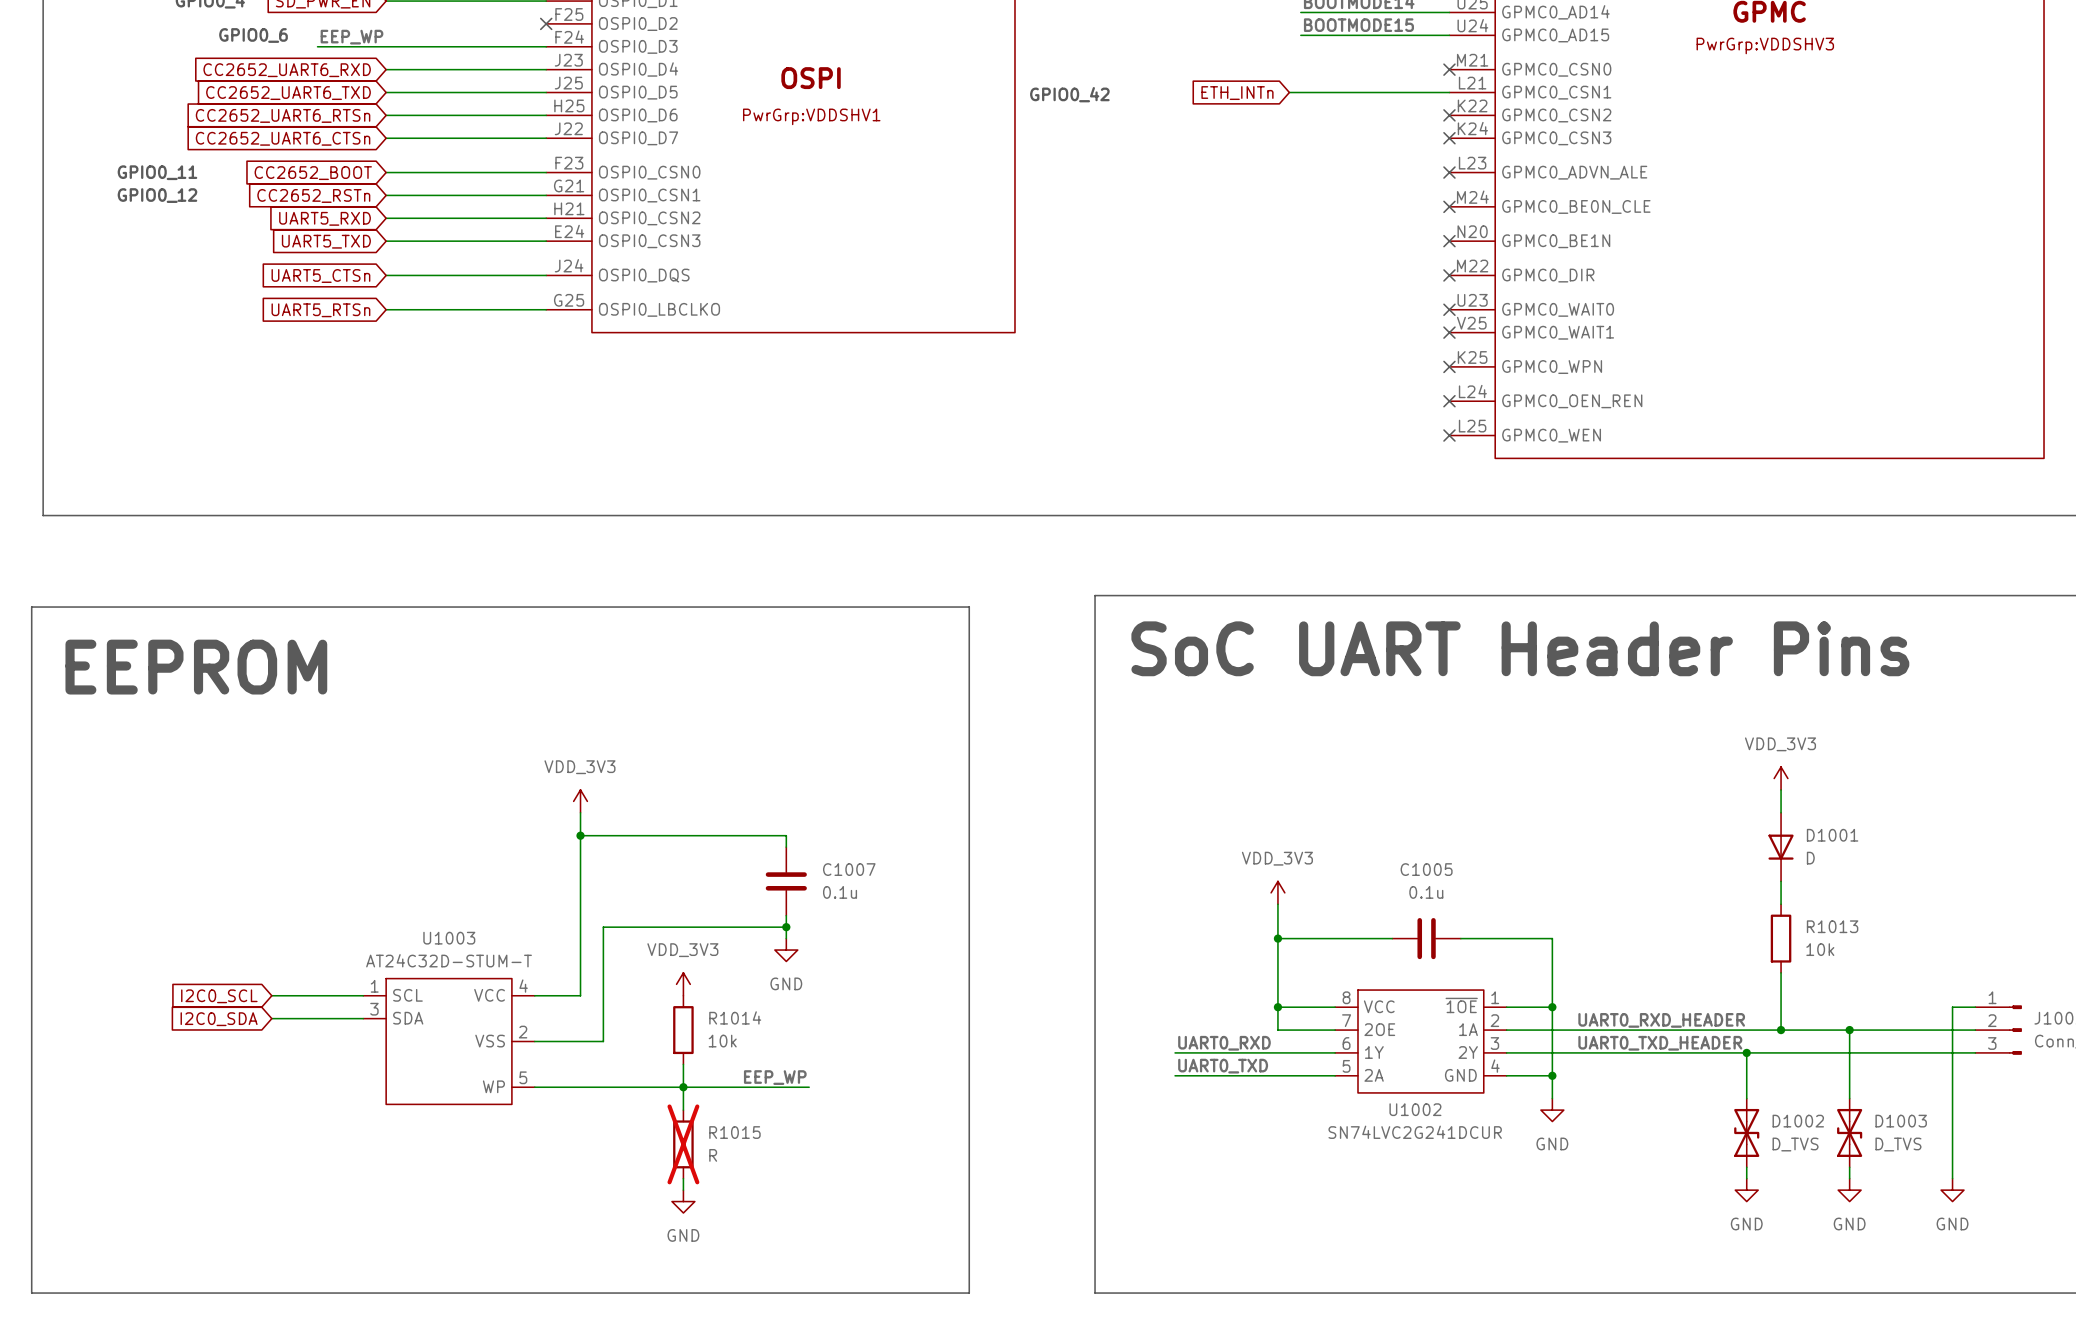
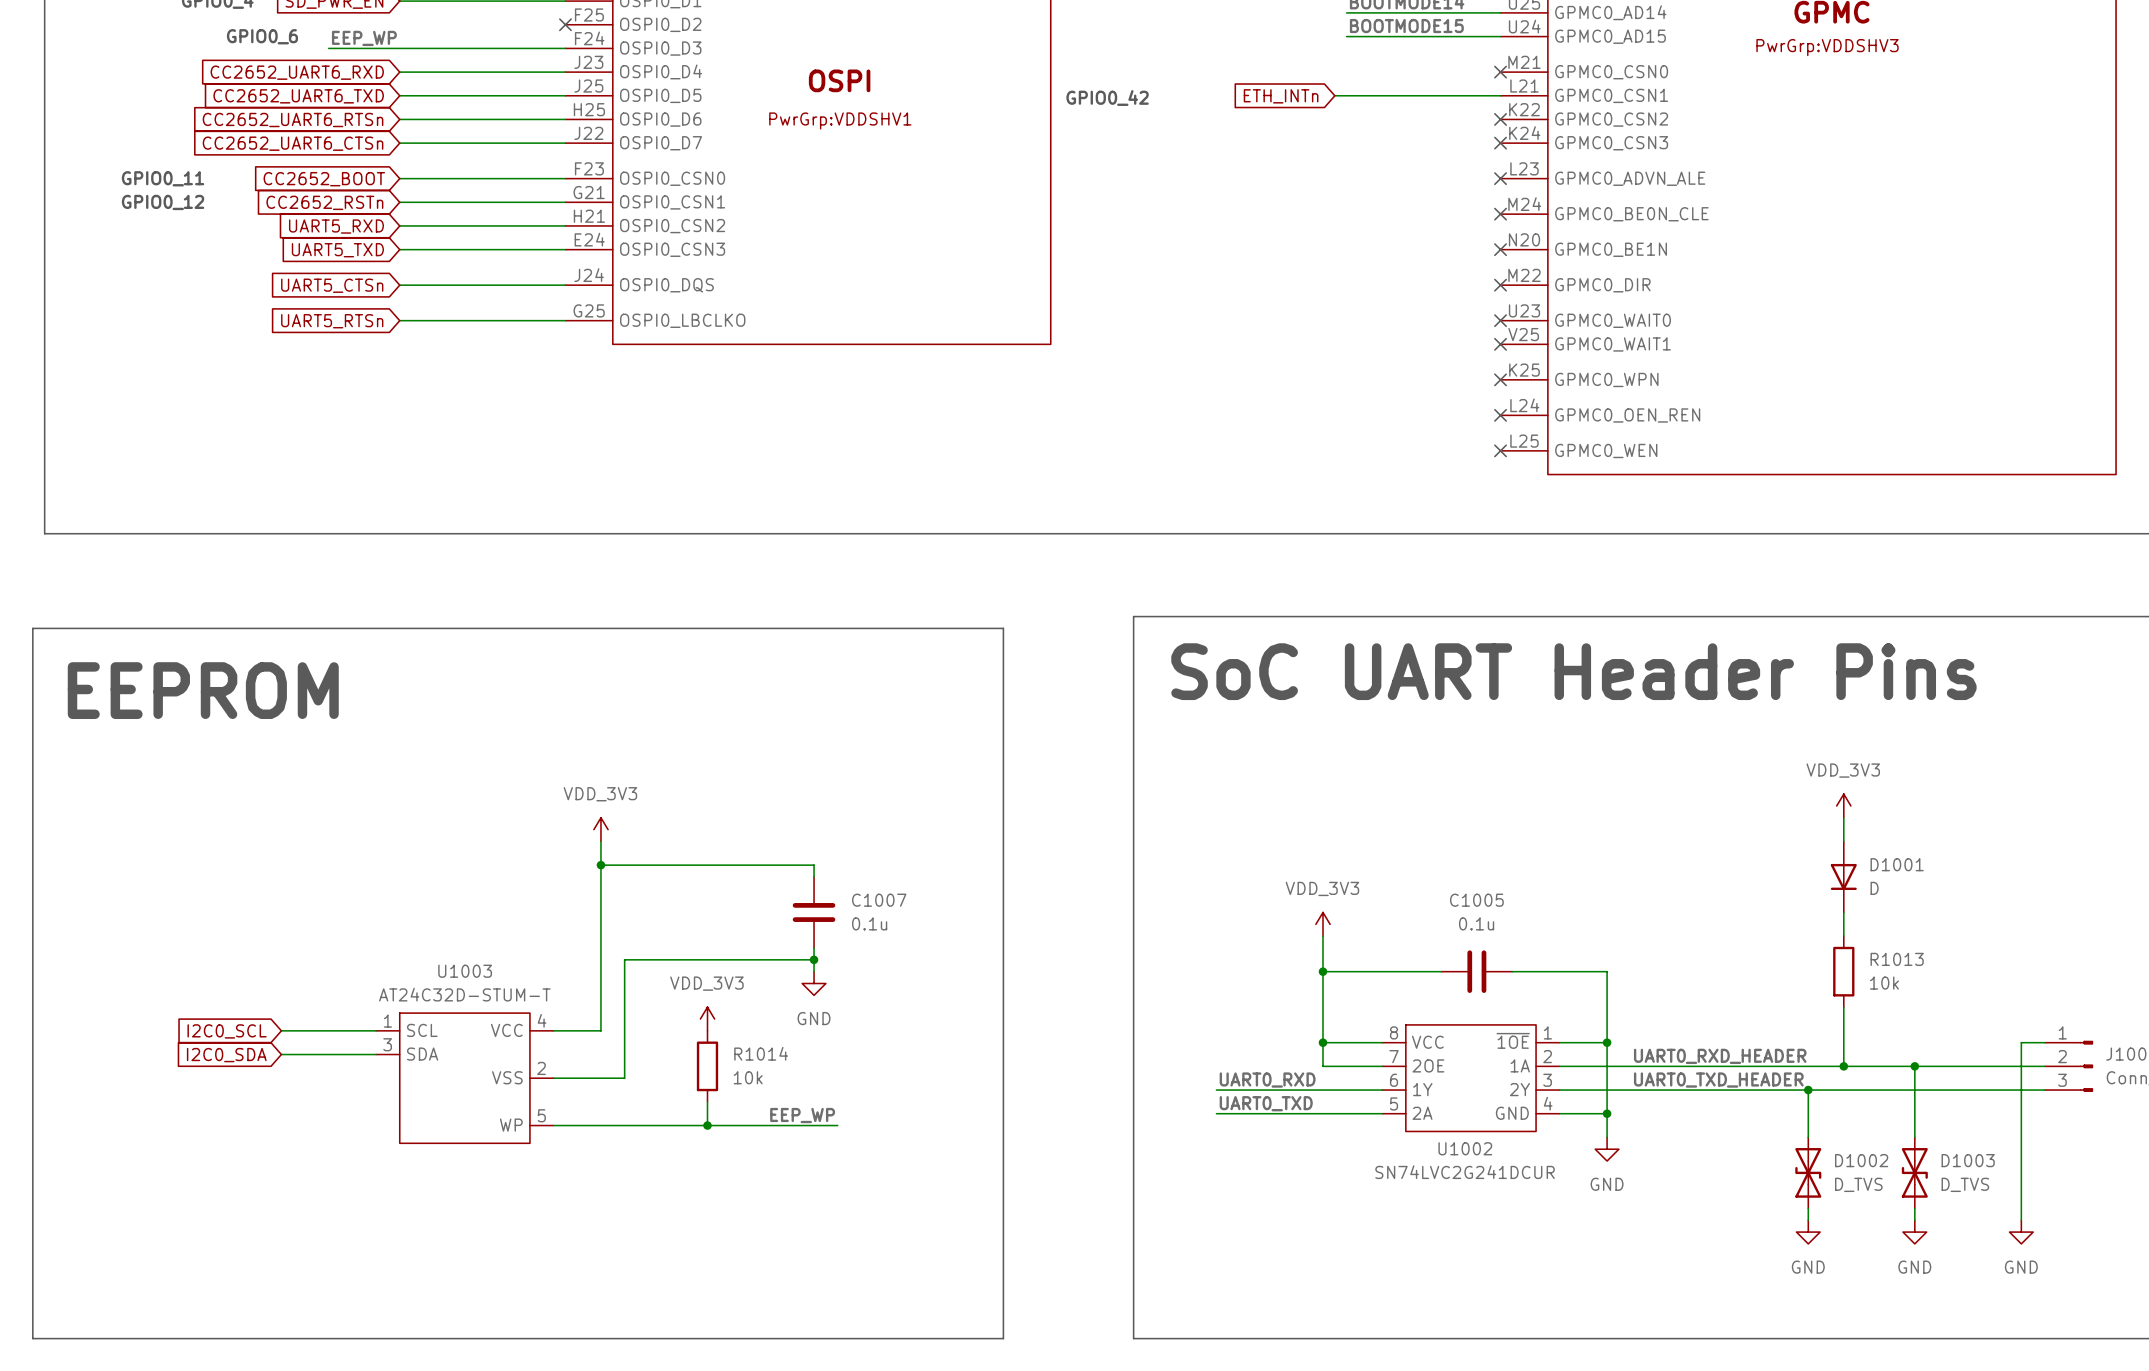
wire: (683, 1087) (683, 1110) -> none
R1015: R (683, 1144) -> none
wire: (683, 1178) (683, 1190) -> none
power symbol: GND (683, 1201) -> none

